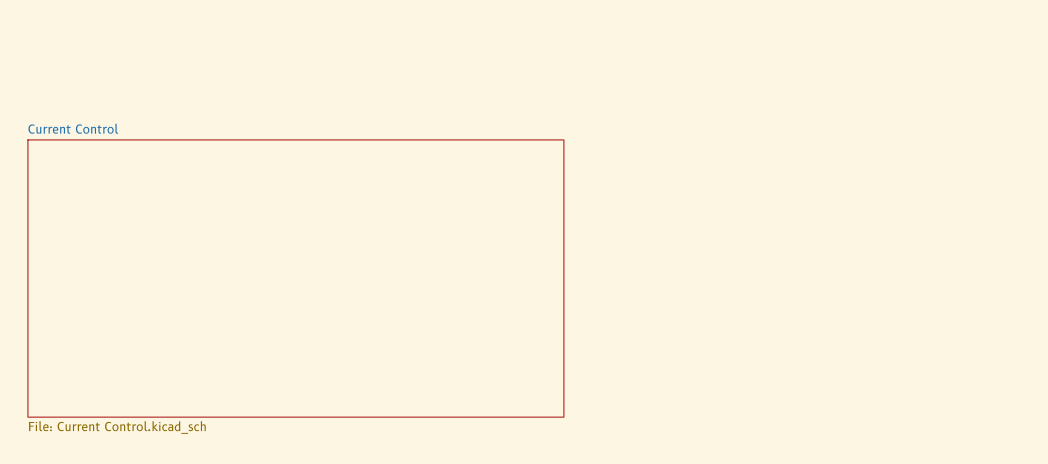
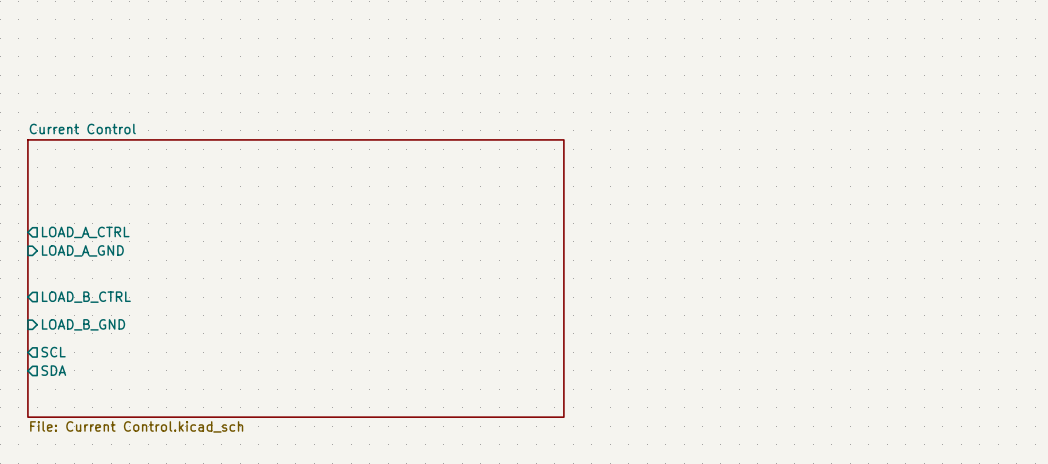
sheet pin: none -> LOAD_A_CTRL (85, 232)
sheet pin: none -> LOAD_A_GND (82, 250)
sheet pin: none -> LOAD_B_CTRL (86, 297)
sheet pin: none -> LOAD_B_GND (83, 324)
sheet pin: none -> SCL (53, 352)
sheet pin: none -> SDA (53, 370)

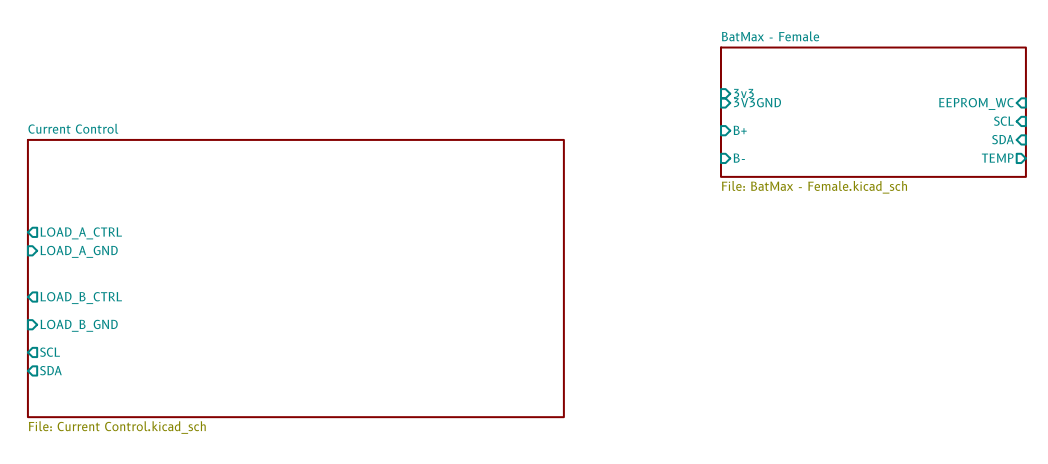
sheet pin: none -> 3v3 (743, 93)
sheet pin: none -> 3V3GND (757, 102)
sheet pin: none -> EEPROM_WC (976, 104)
sheet BatMax - Female: none -> File: BatMax - Female.kicad_sch (873, 112)
sheet pin: none -> SCL (1003, 121)
sheet pin: none -> B+ (740, 130)
sheet pin: none -> SDA (1003, 139)
sheet pin: none -> B- (739, 158)
sheet pin: none -> TEMP (997, 158)

